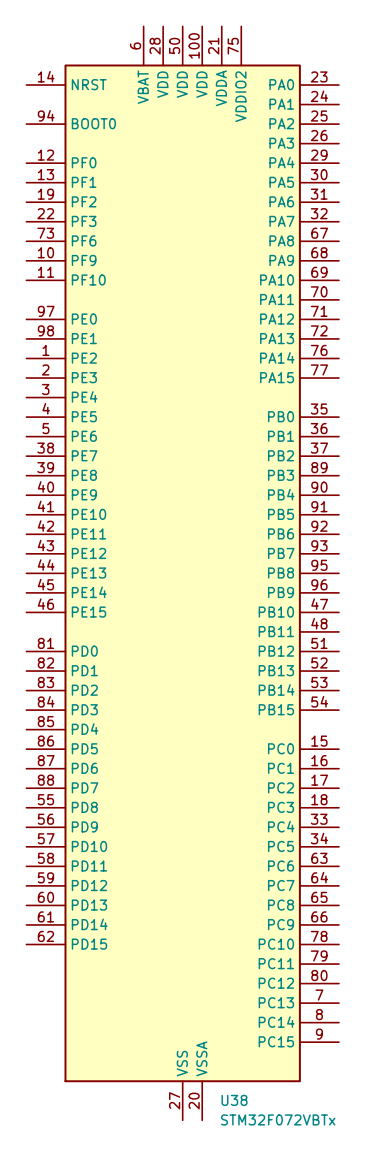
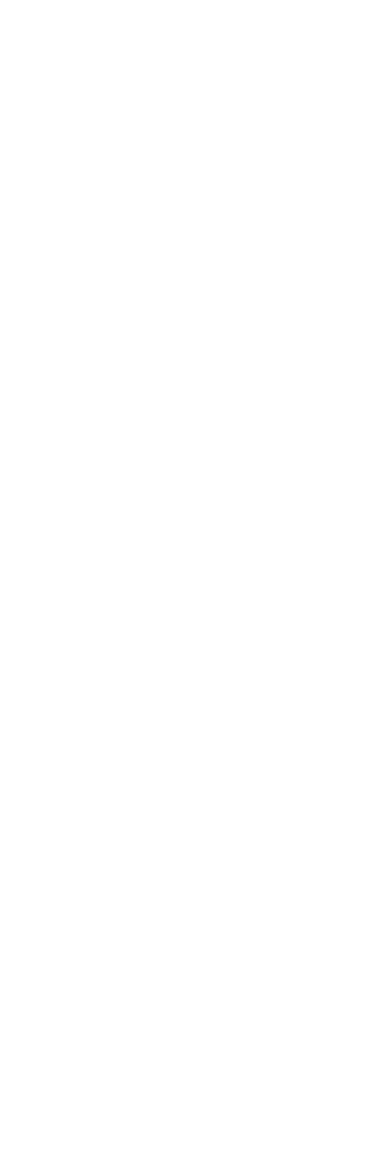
U38: STM32F072VBTx (182, 573) -> none

